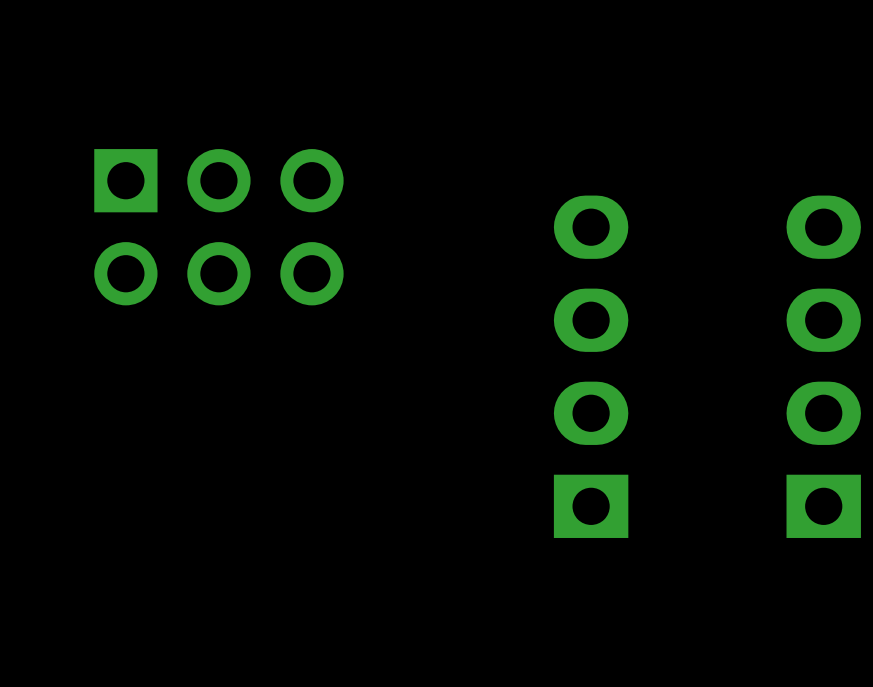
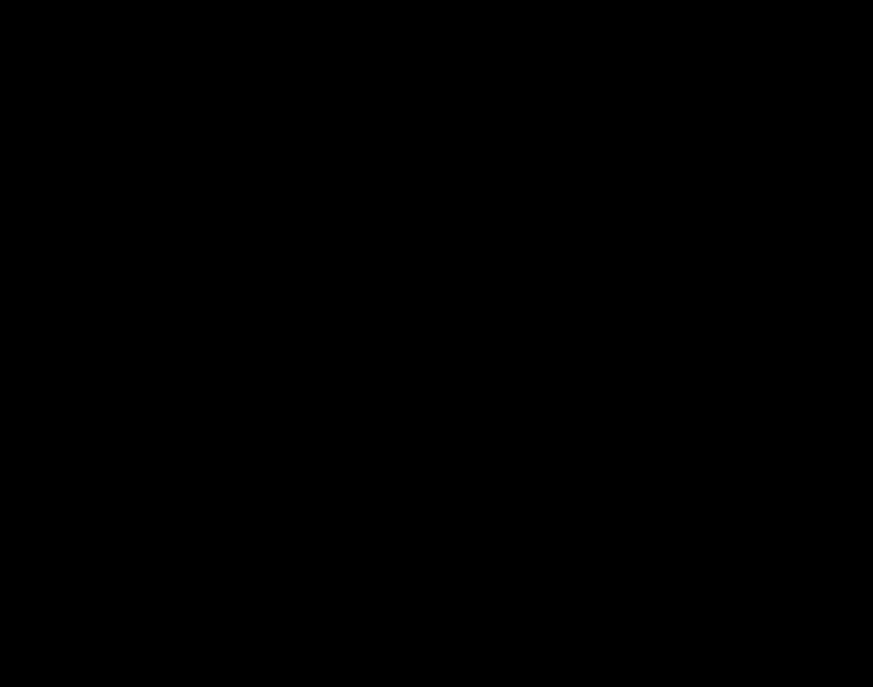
part: (218, 227) -> none
part: (591, 366) -> none
part: (823, 366) -> none

